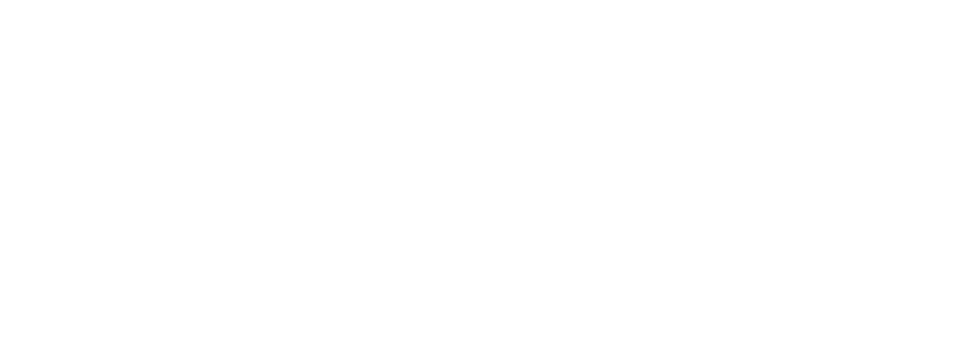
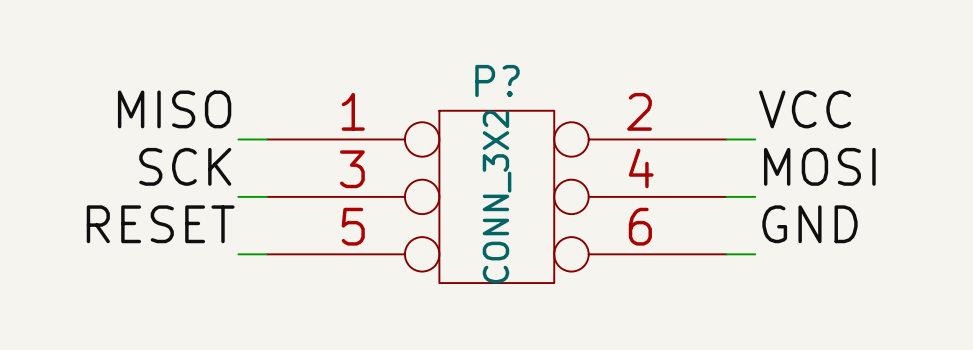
label: none -> MISO (174, 109)
label: none -> VCC (805, 109)
wire: none -> (238, 139) (267, 139)
wire: none -> (726, 139) (755, 139)
label: none -> SCK (185, 166)
label: none -> MOSI (819, 166)
wire: none -> (238, 196) (267, 196)
P?: none -> CONN_3X2 (496, 196)
wire: none -> (726, 196) (755, 196)
label: none -> RESET (160, 224)
label: none -> GND (809, 224)
wire: none -> (238, 254) (267, 254)
wire: none -> (726, 254) (755, 254)

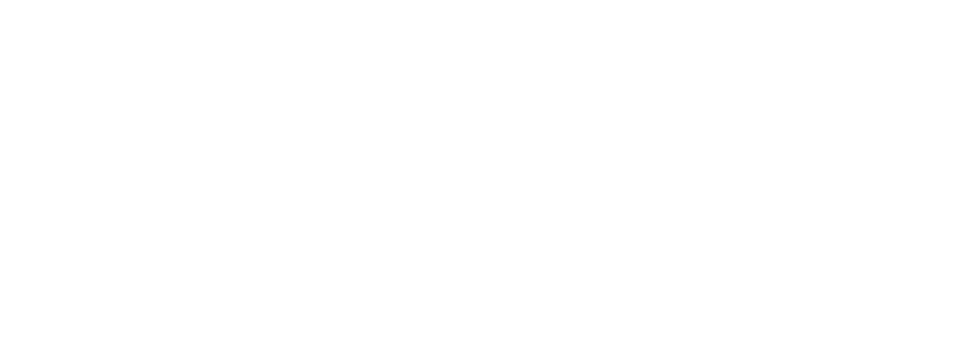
label: MISO (174, 109) -> none
label: VCC (805, 109) -> none
wire: (238, 139) (267, 139) -> none
wire: (726, 139) (755, 139) -> none
label: SCK (185, 166) -> none
label: MOSI (819, 166) -> none
wire: (238, 196) (267, 196) -> none
P?: CONN_3X2 (496, 196) -> none
wire: (726, 196) (755, 196) -> none
label: RESET (160, 224) -> none
label: GND (809, 224) -> none
wire: (238, 254) (267, 254) -> none
wire: (726, 254) (755, 254) -> none

